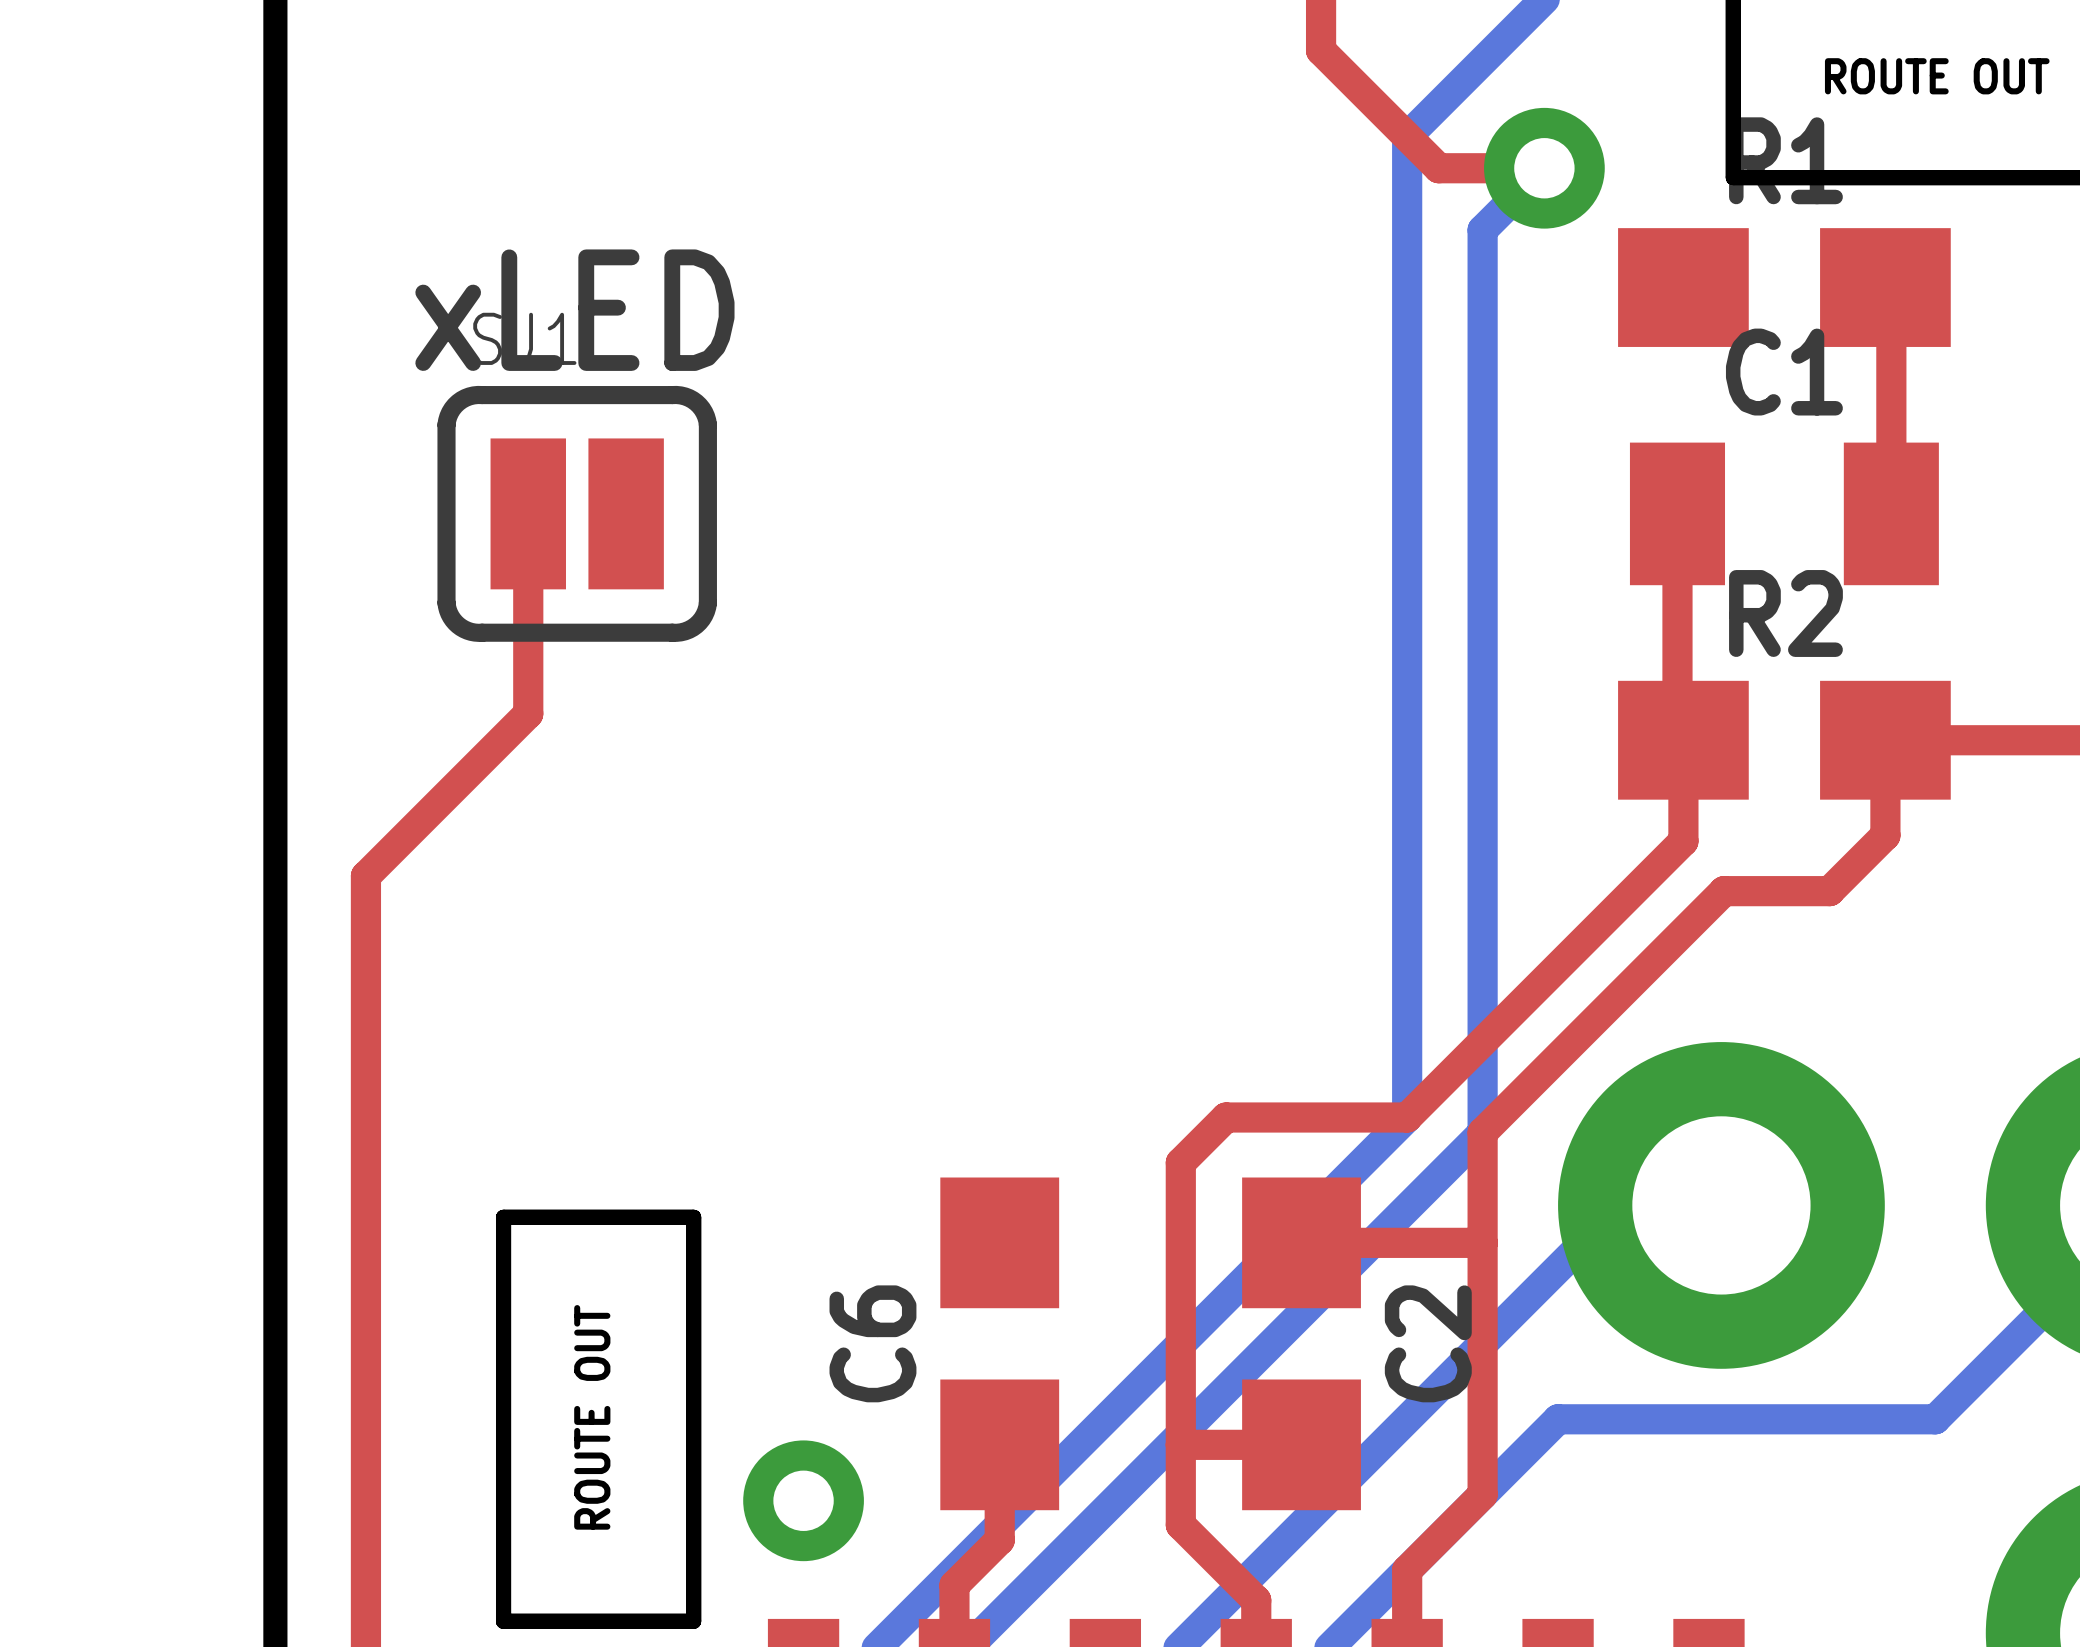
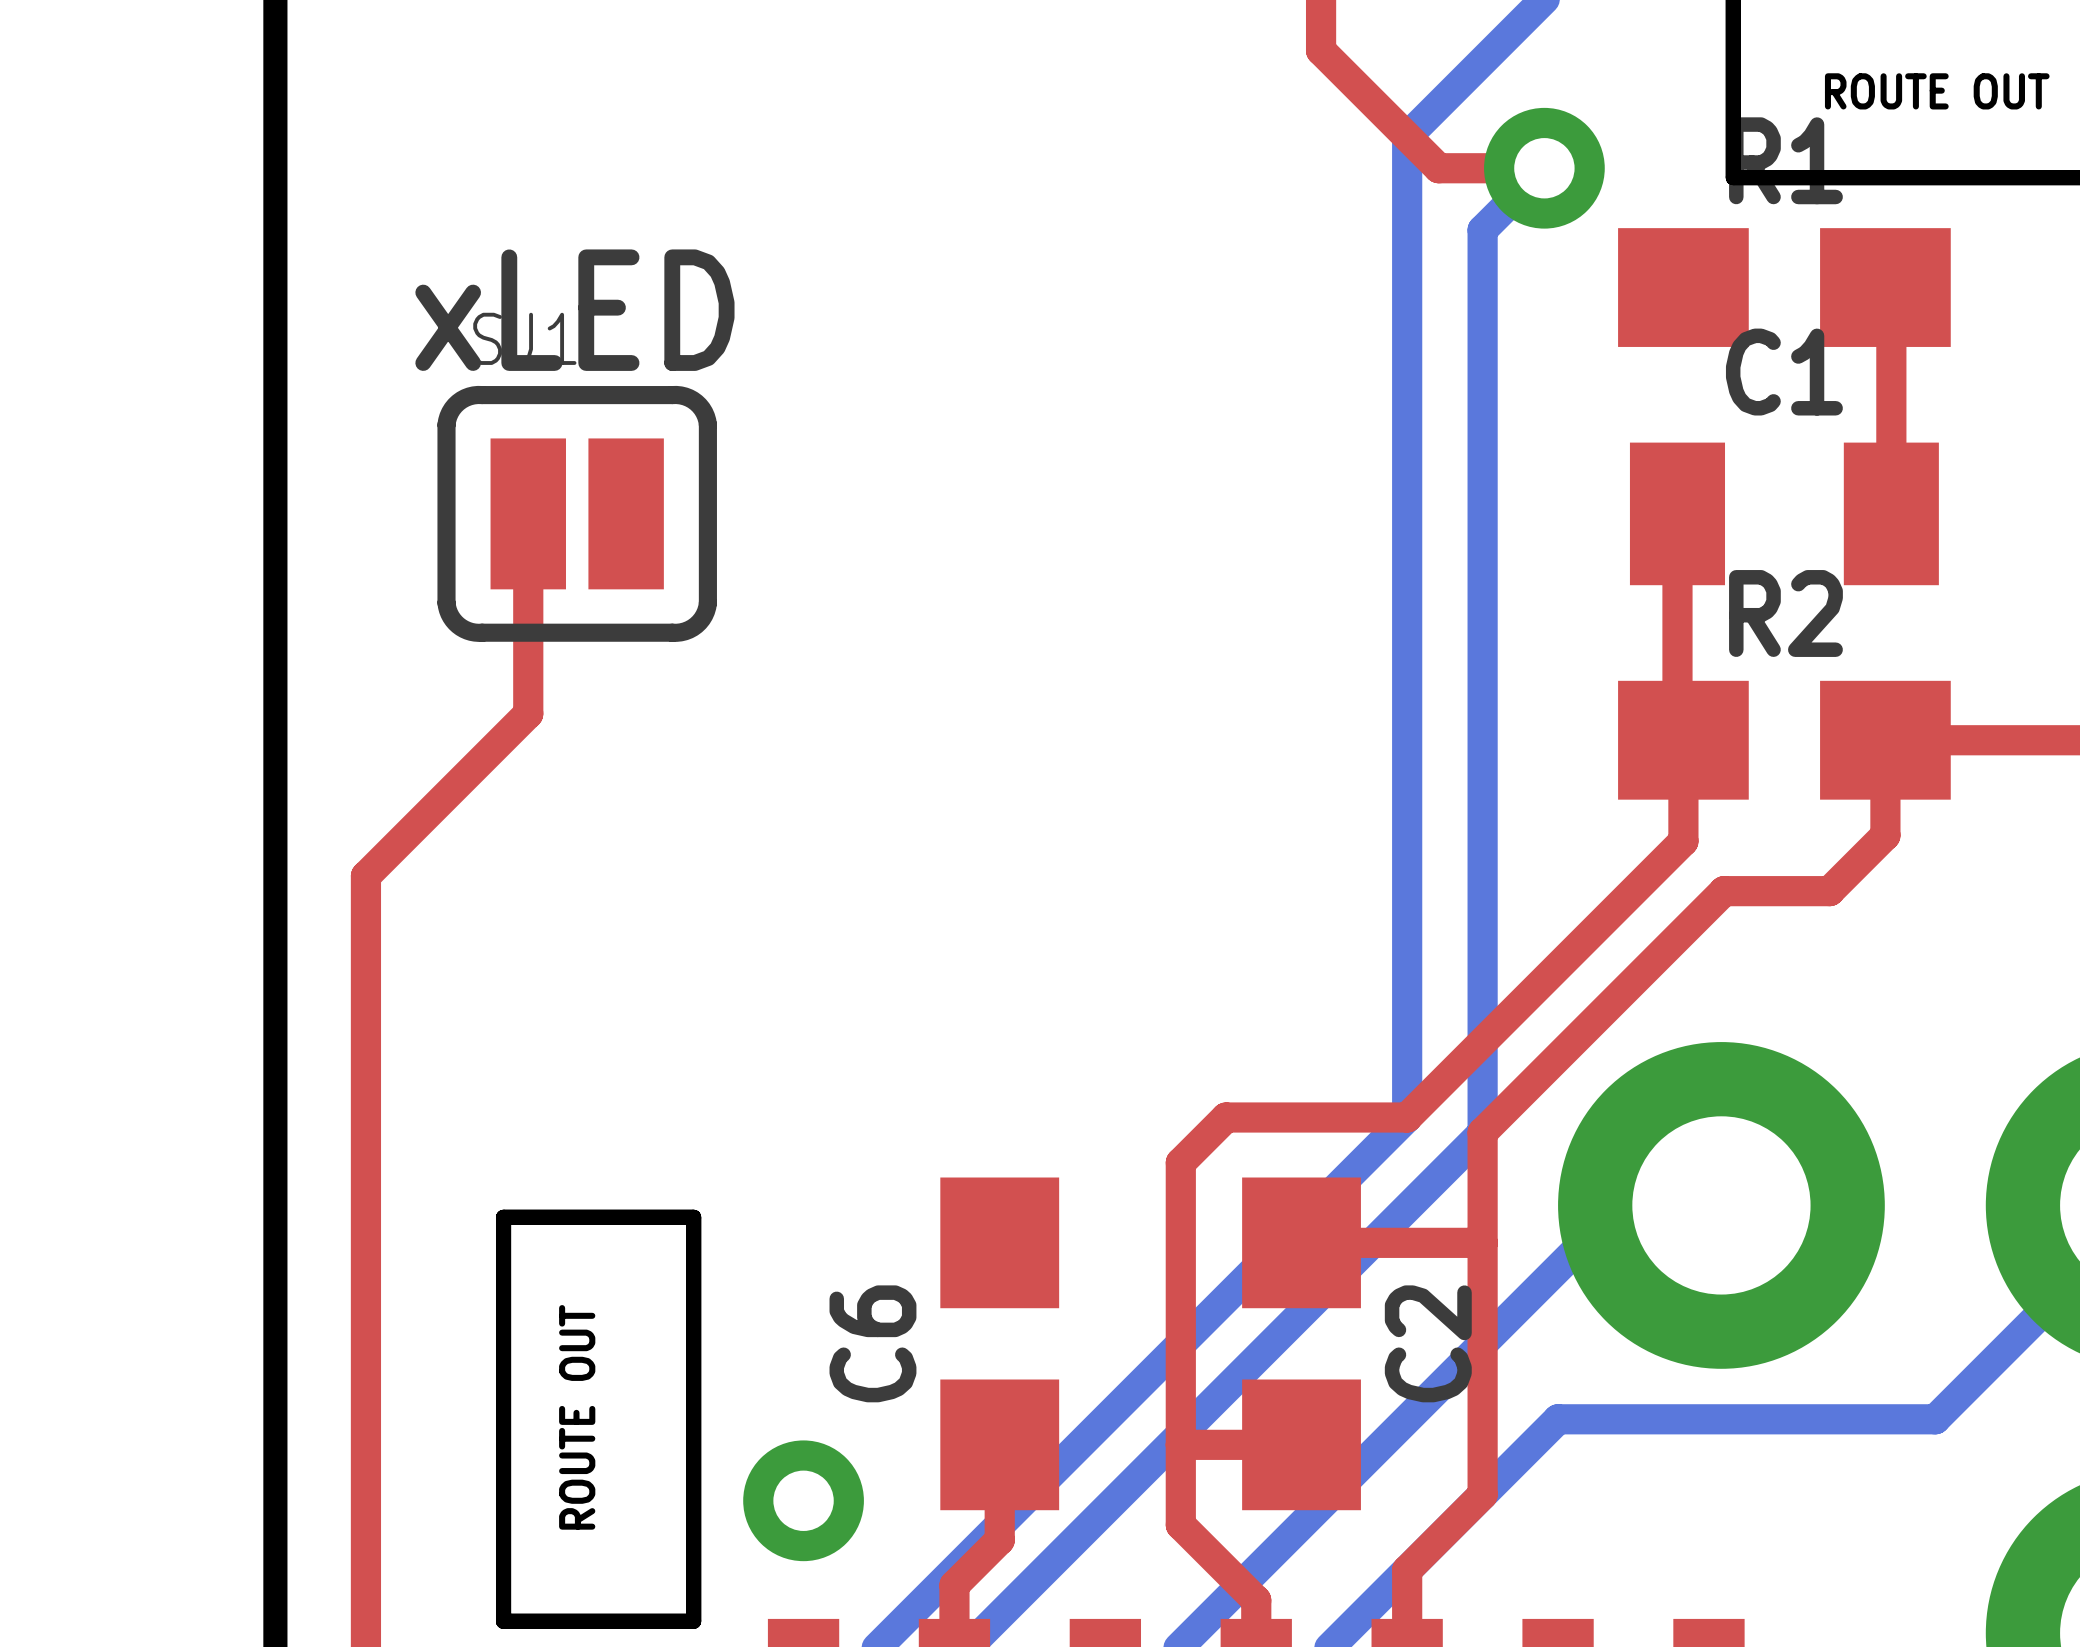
text position: ROUTE OUT (1937, 76) -> ROUTE OUT (1937, 91)
text position: ROUTE OUT (592, 1417) -> ROUTE OUT (577, 1417)

